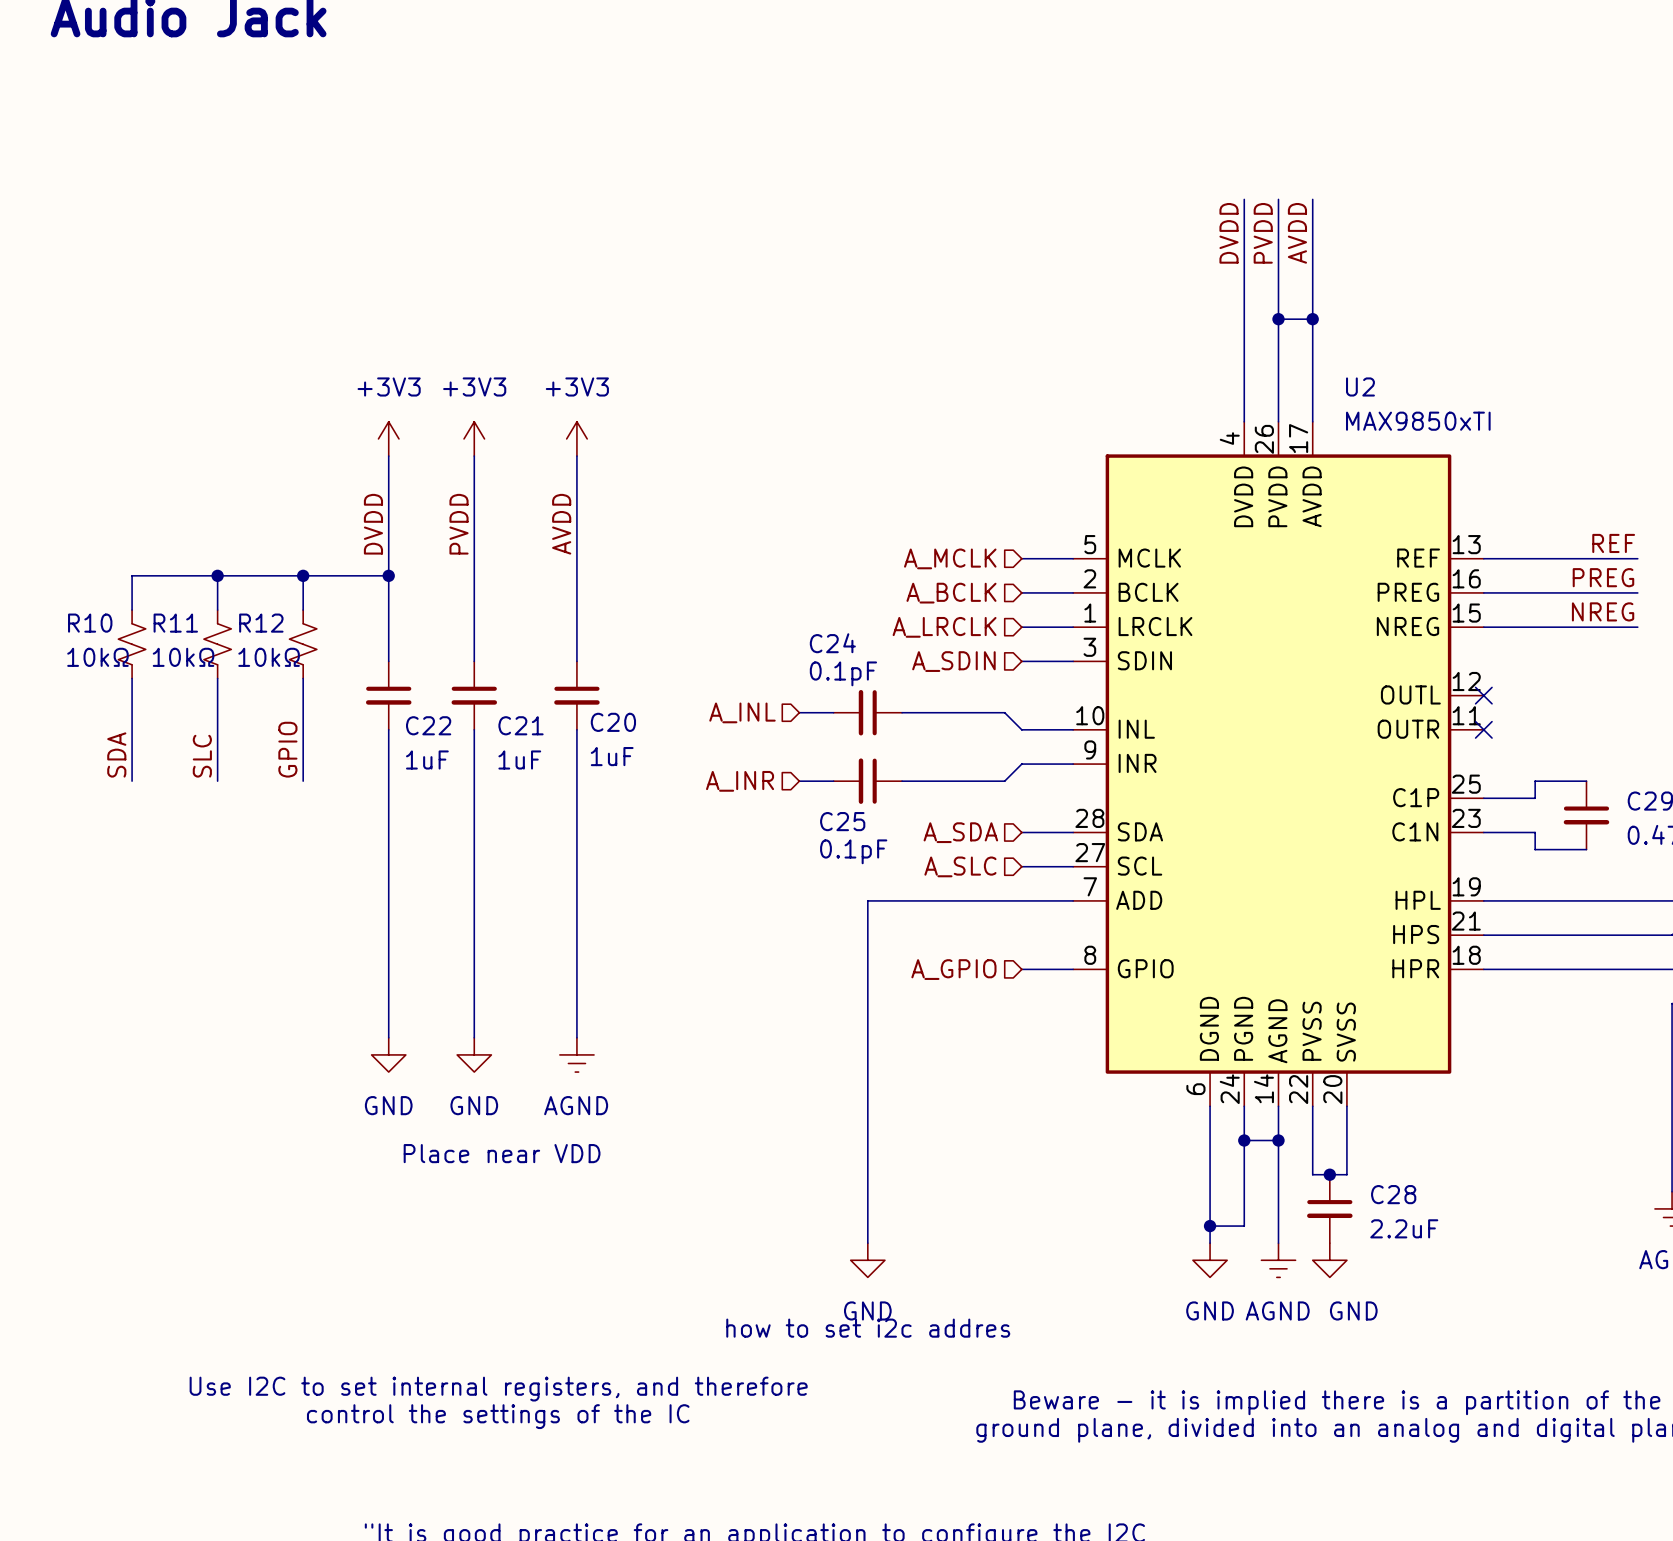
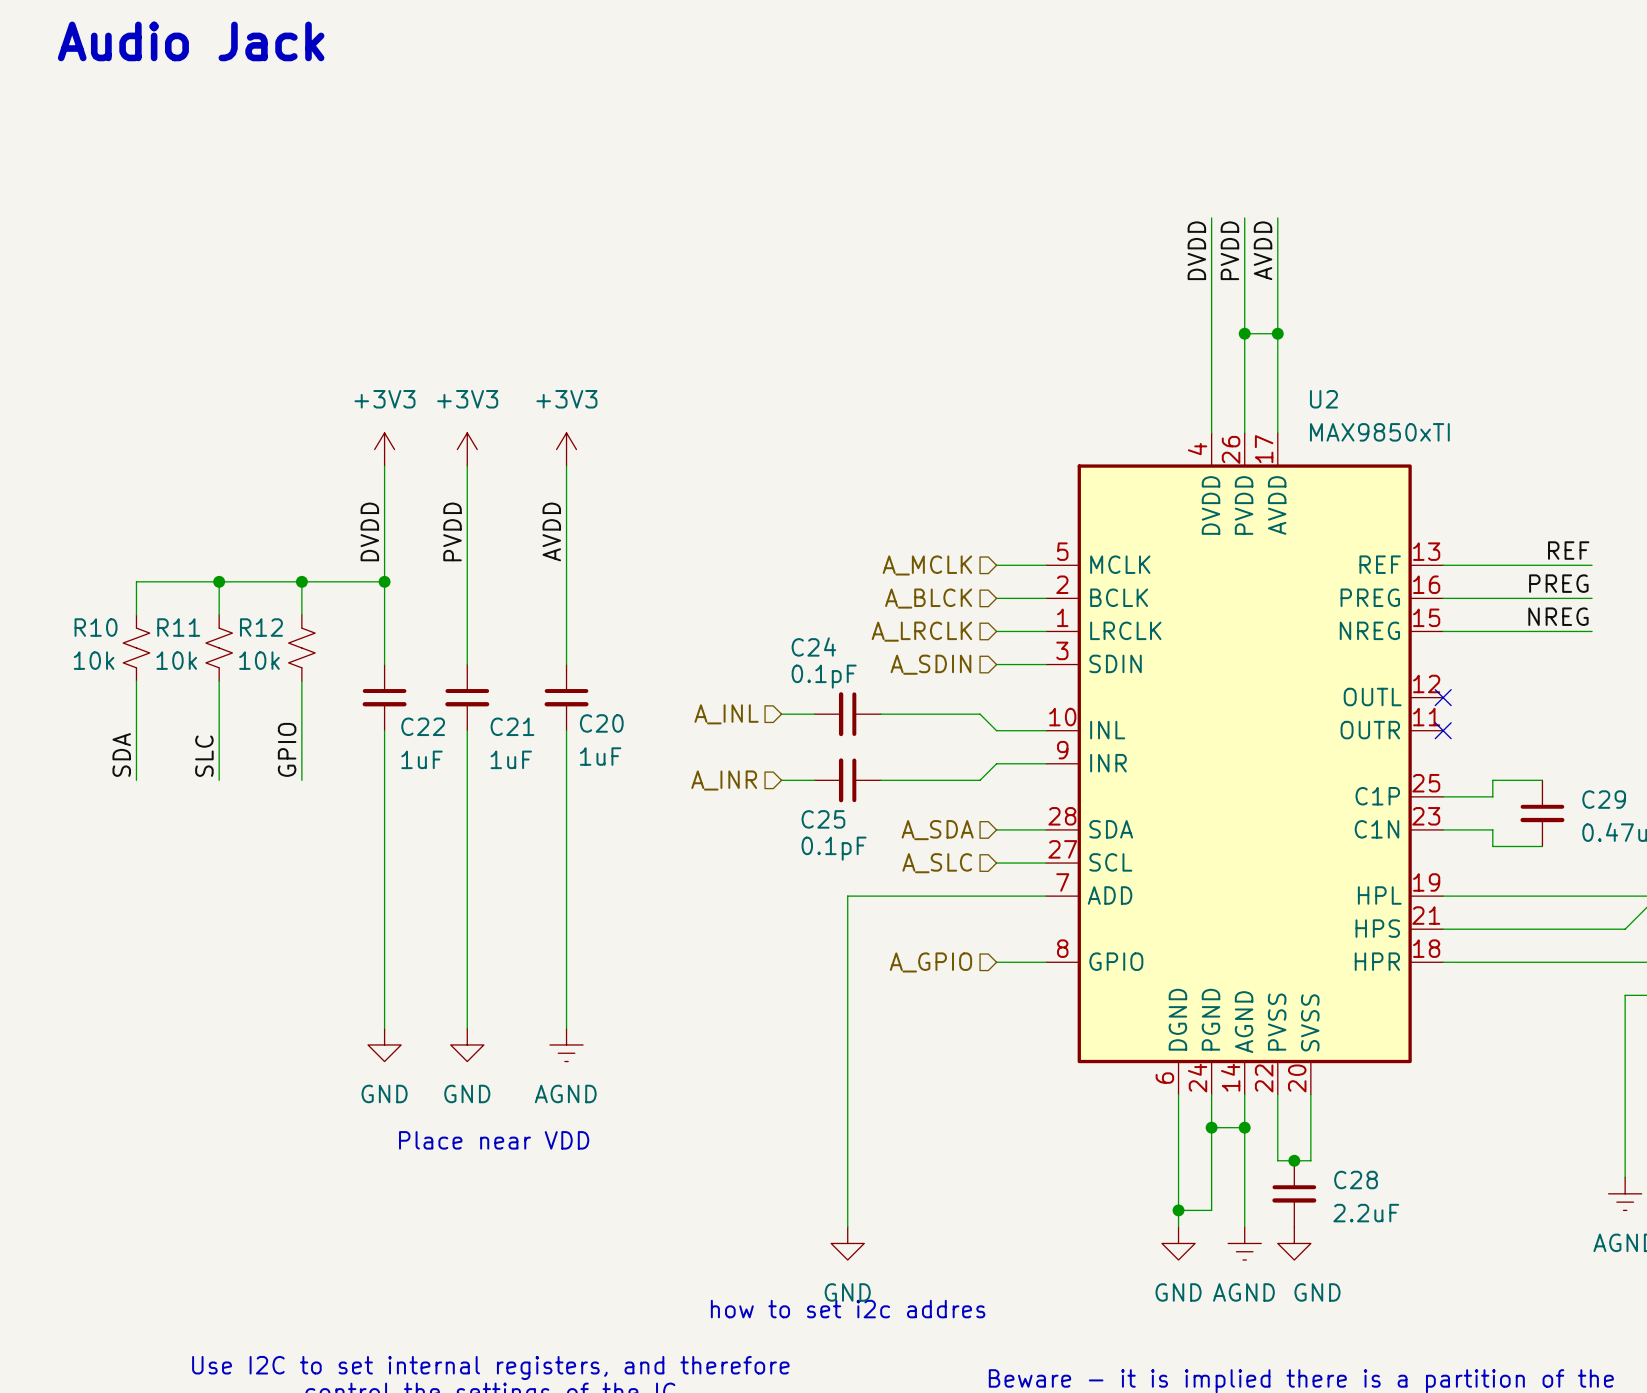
hierarchical label: A_BCLK (951, 593) -> A_BLCK (928, 598)
R10 value: 10kΩ (97, 657) -> 10k (94, 660)
R11 value: 10kΩ (183, 657) -> 10k (176, 660)
R12 value: 10kΩ (269, 657) -> 10k (259, 660)

